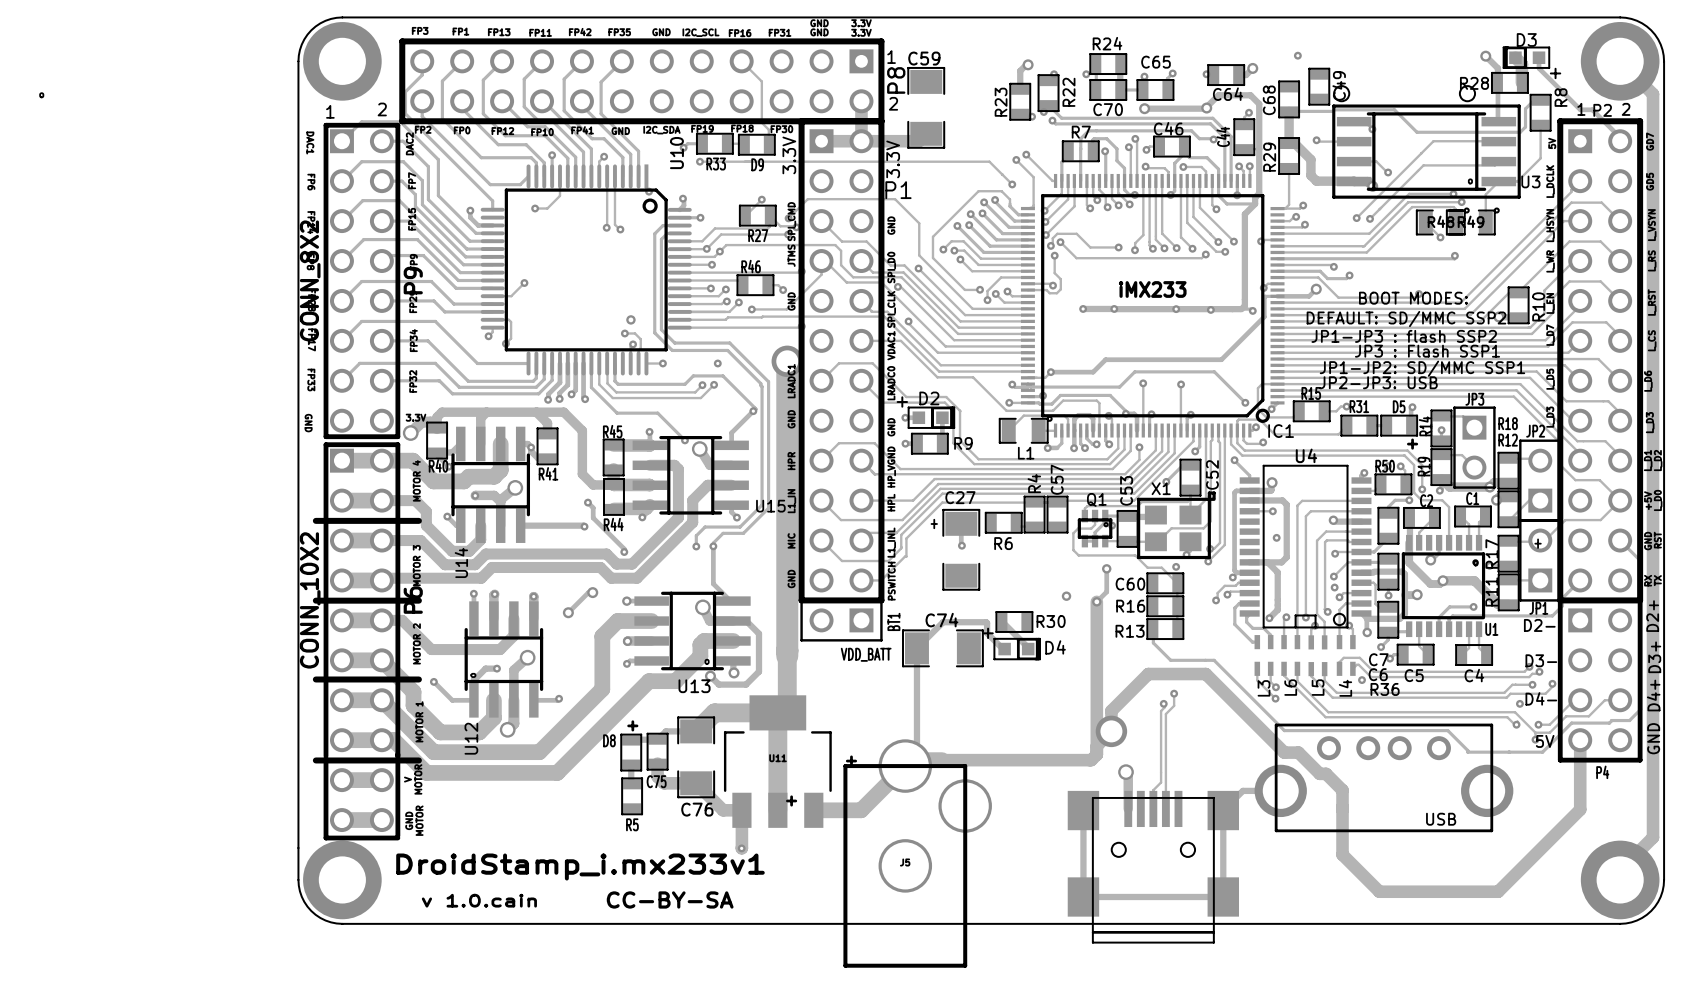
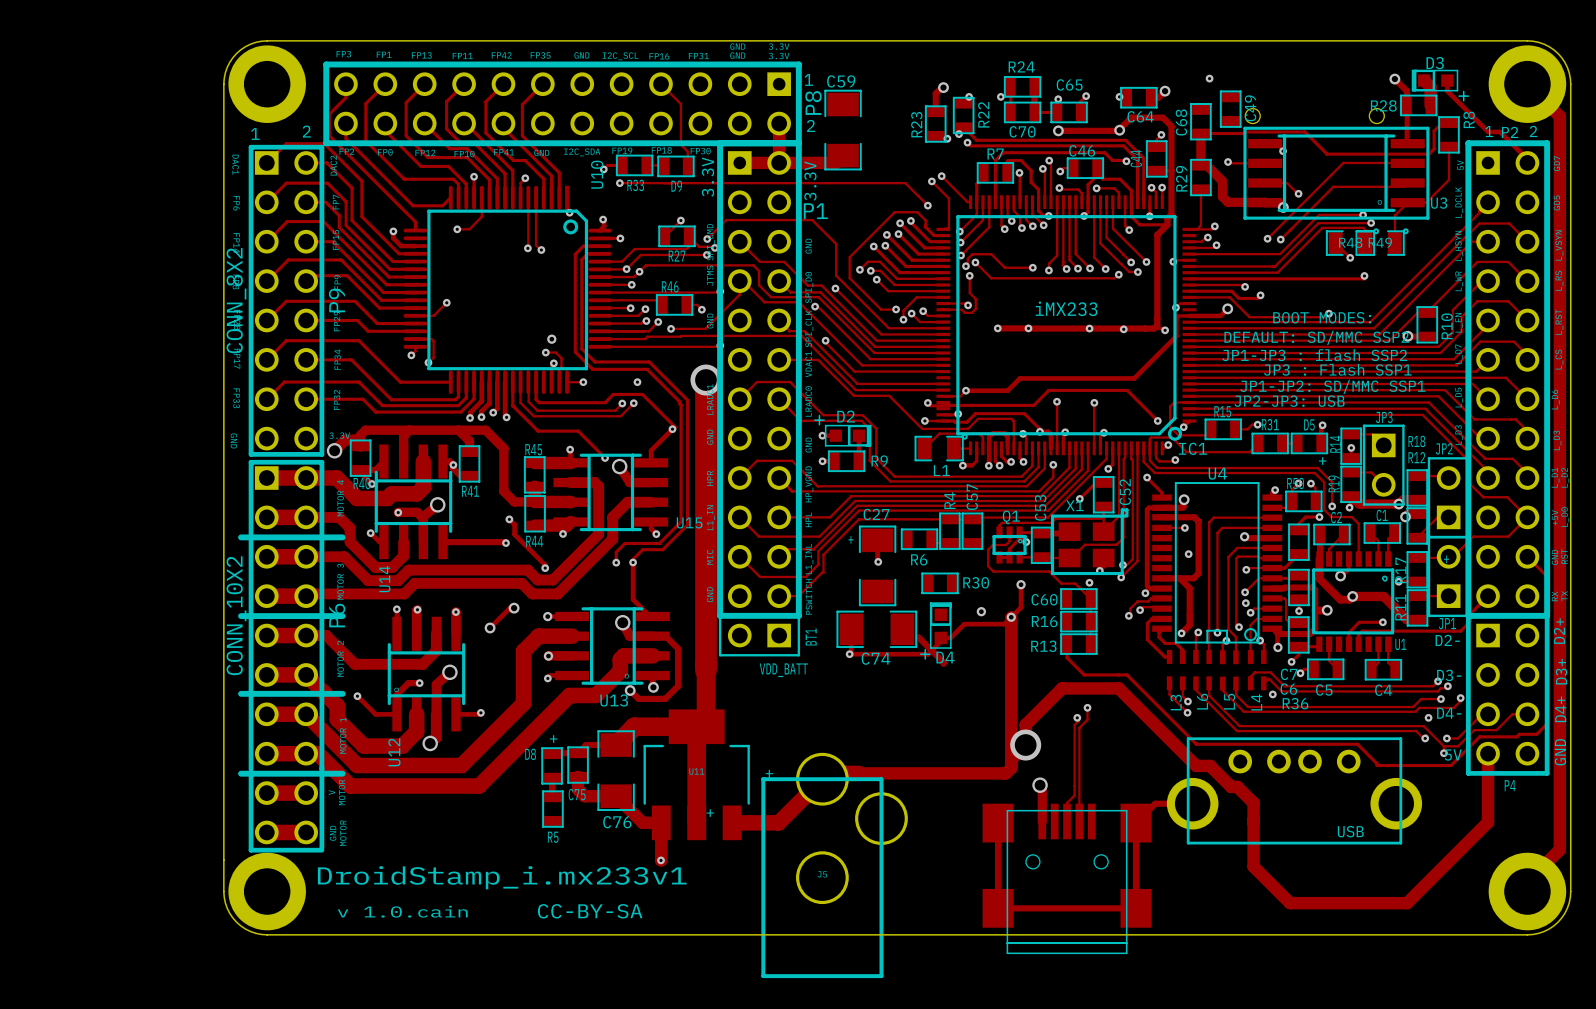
track: none -> (1011, 617) (1004, 624) (964, 624) (950, 637) (940, 637) (940, 641) (928, 654) (849, 654) (851, 629)
C74 name position: C74 (941, 620) -> C74 (875, 658)
R30 position: (1014, 621) -> (939, 583)
via: none -> (849, 654)
D4 rotation: 0° (1011, 643) -> 90° counterclockwise (935, 630)
D4 name position: D4 (1055, 647) -> D4 (945, 657)
C74 position: (942, 648) -> (876, 629)
track: (1004, 649) (987, 633) (986, 622) (943, 622) (916, 648) (916, 754) (905, 766) -> none

